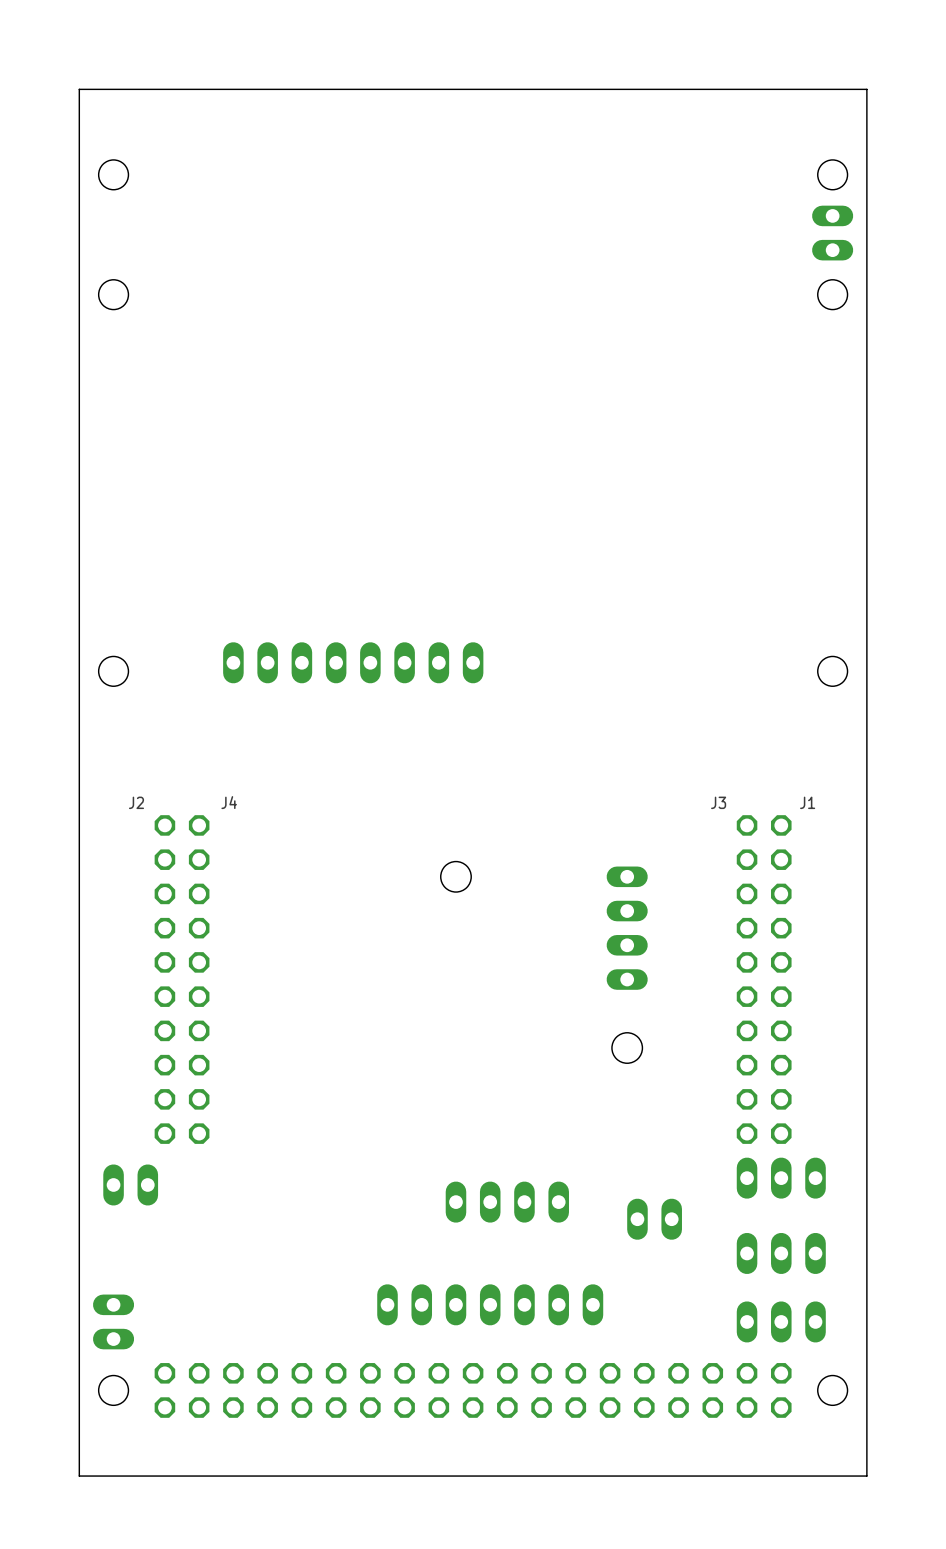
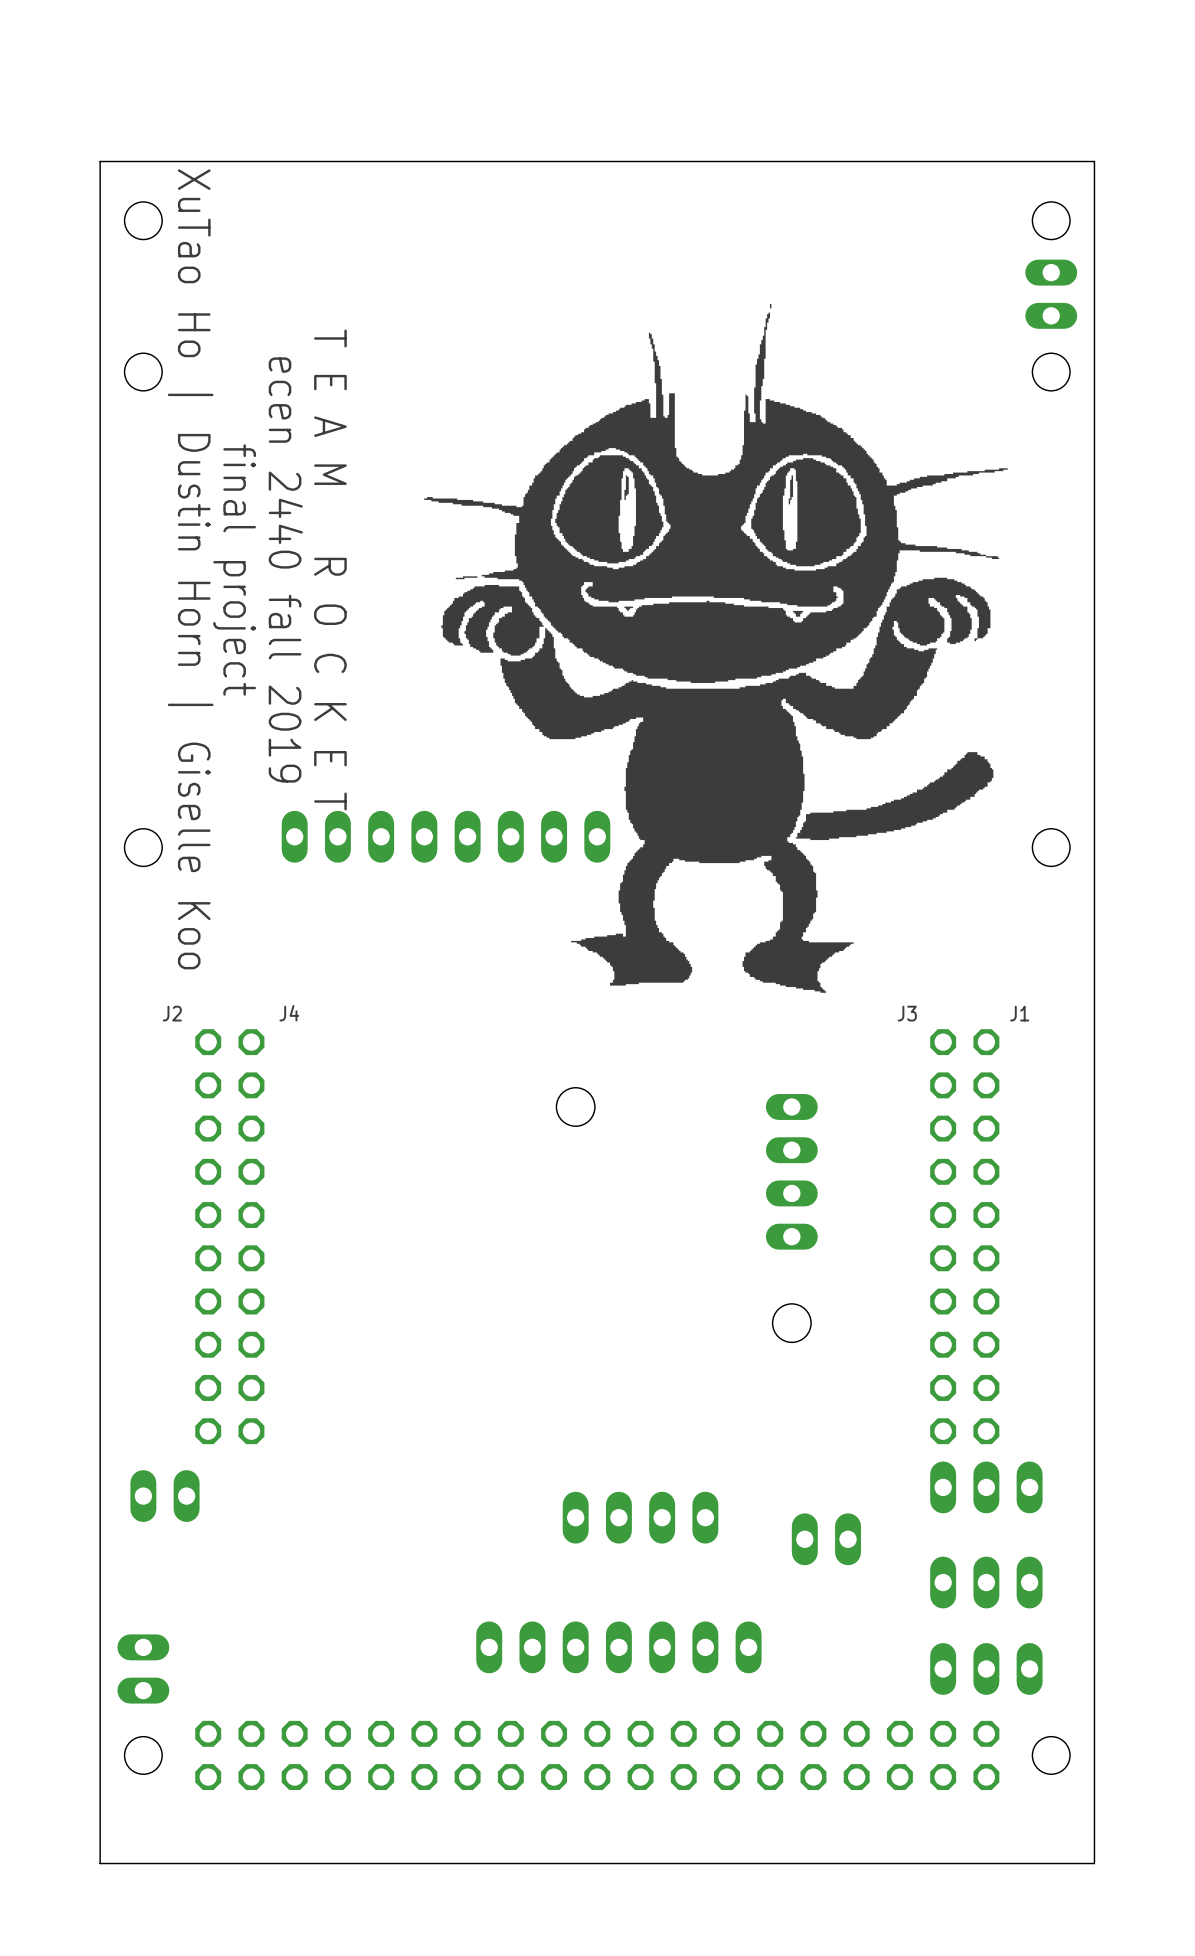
board edge: (866, 127) (866, 89) (79, 89) (79, 127) -> (1094, 161) (100, 161)
drawing: none -> [424, 303, 1008, 993]
text: none -> XuTao Ho | Dustin Horn | Giselle Koo (190, 569)
text: none -> final project (234, 569)
text: none -> ecen 2440 fall 2019 (285, 569)
text: none -> T E A M R O C K E T (330, 569)

